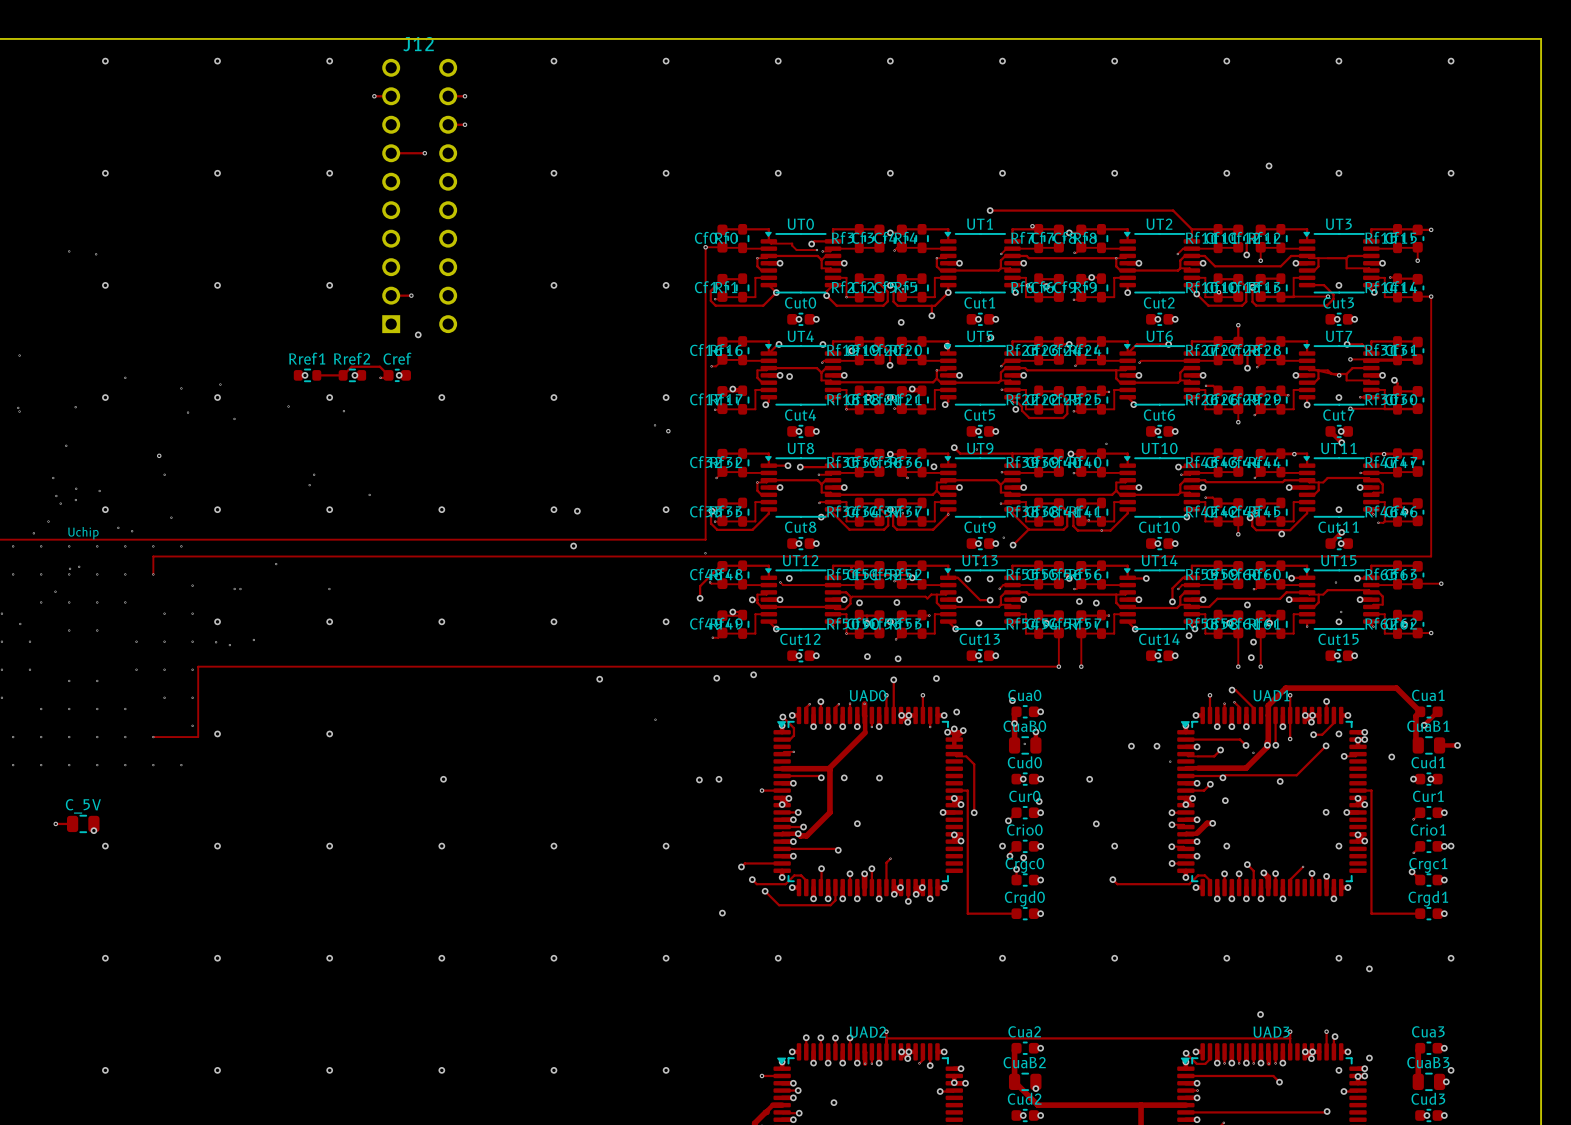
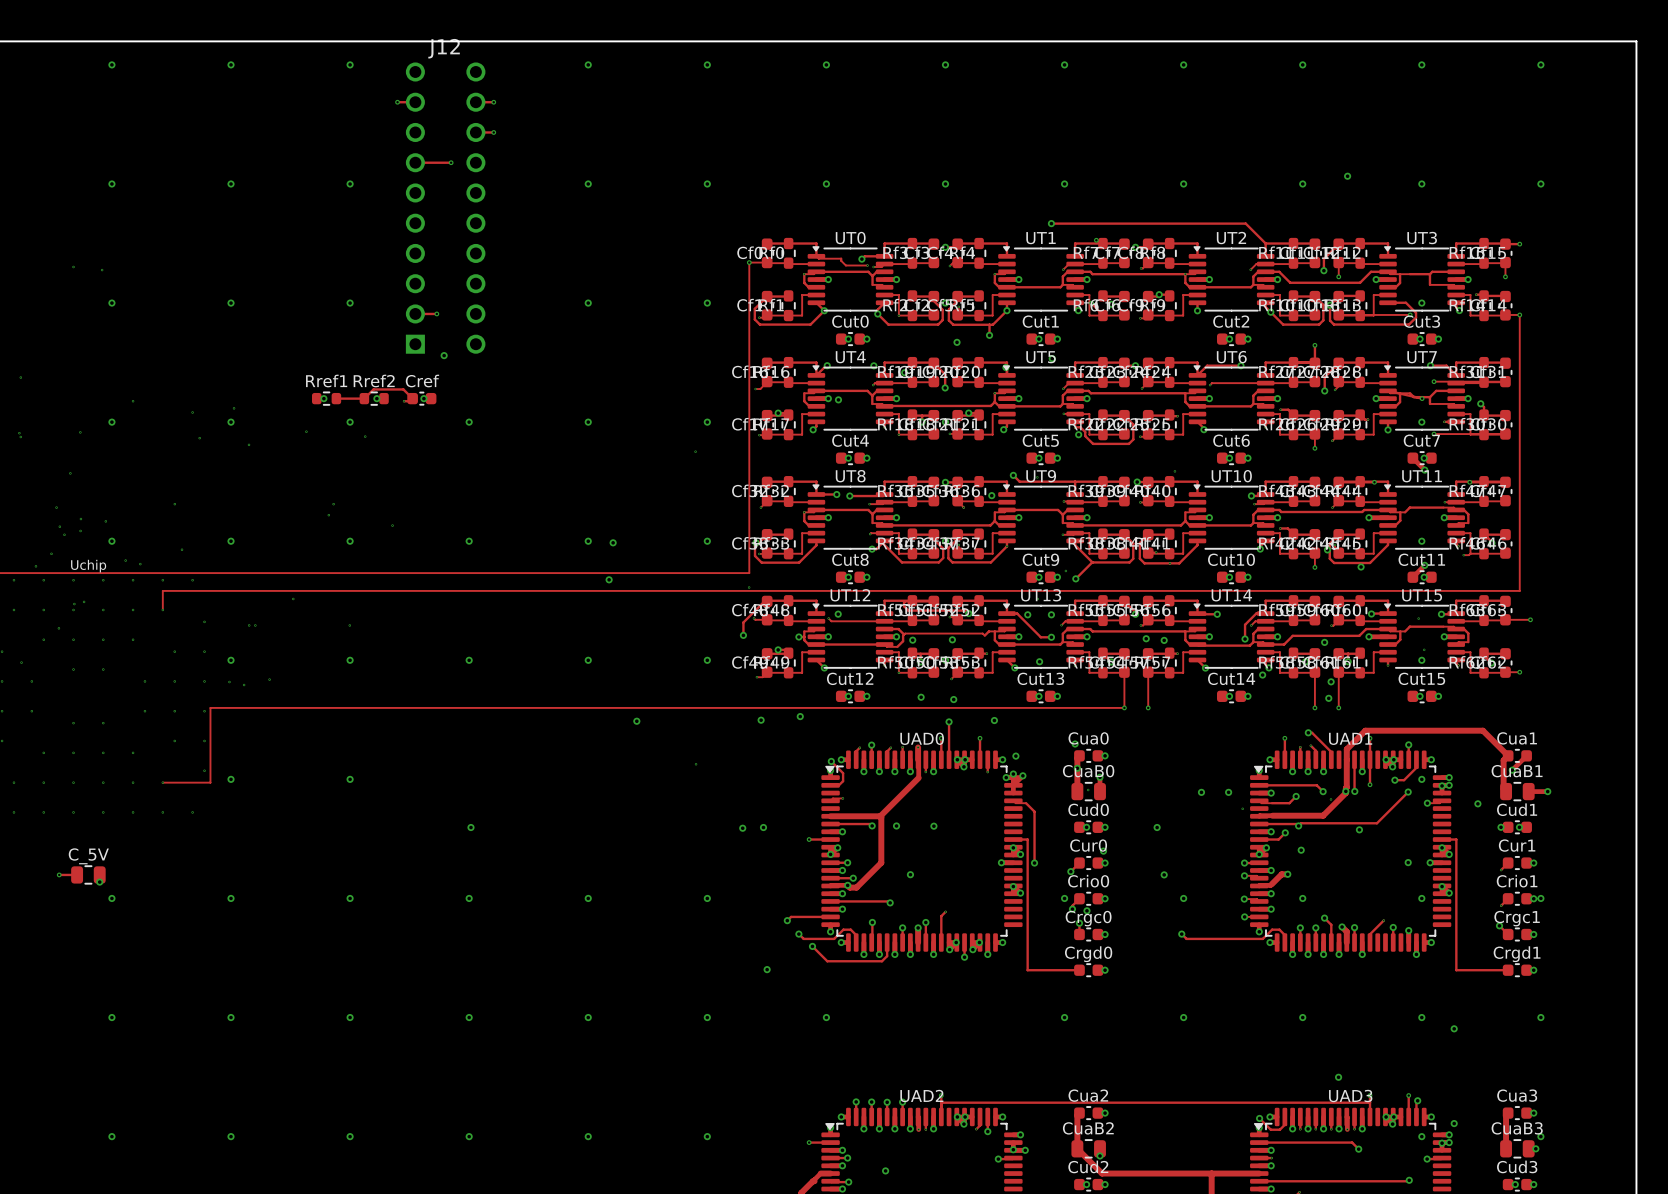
via: (1219, 292) -> none
via: (668, 431) -> none
via: (159, 455) -> none

